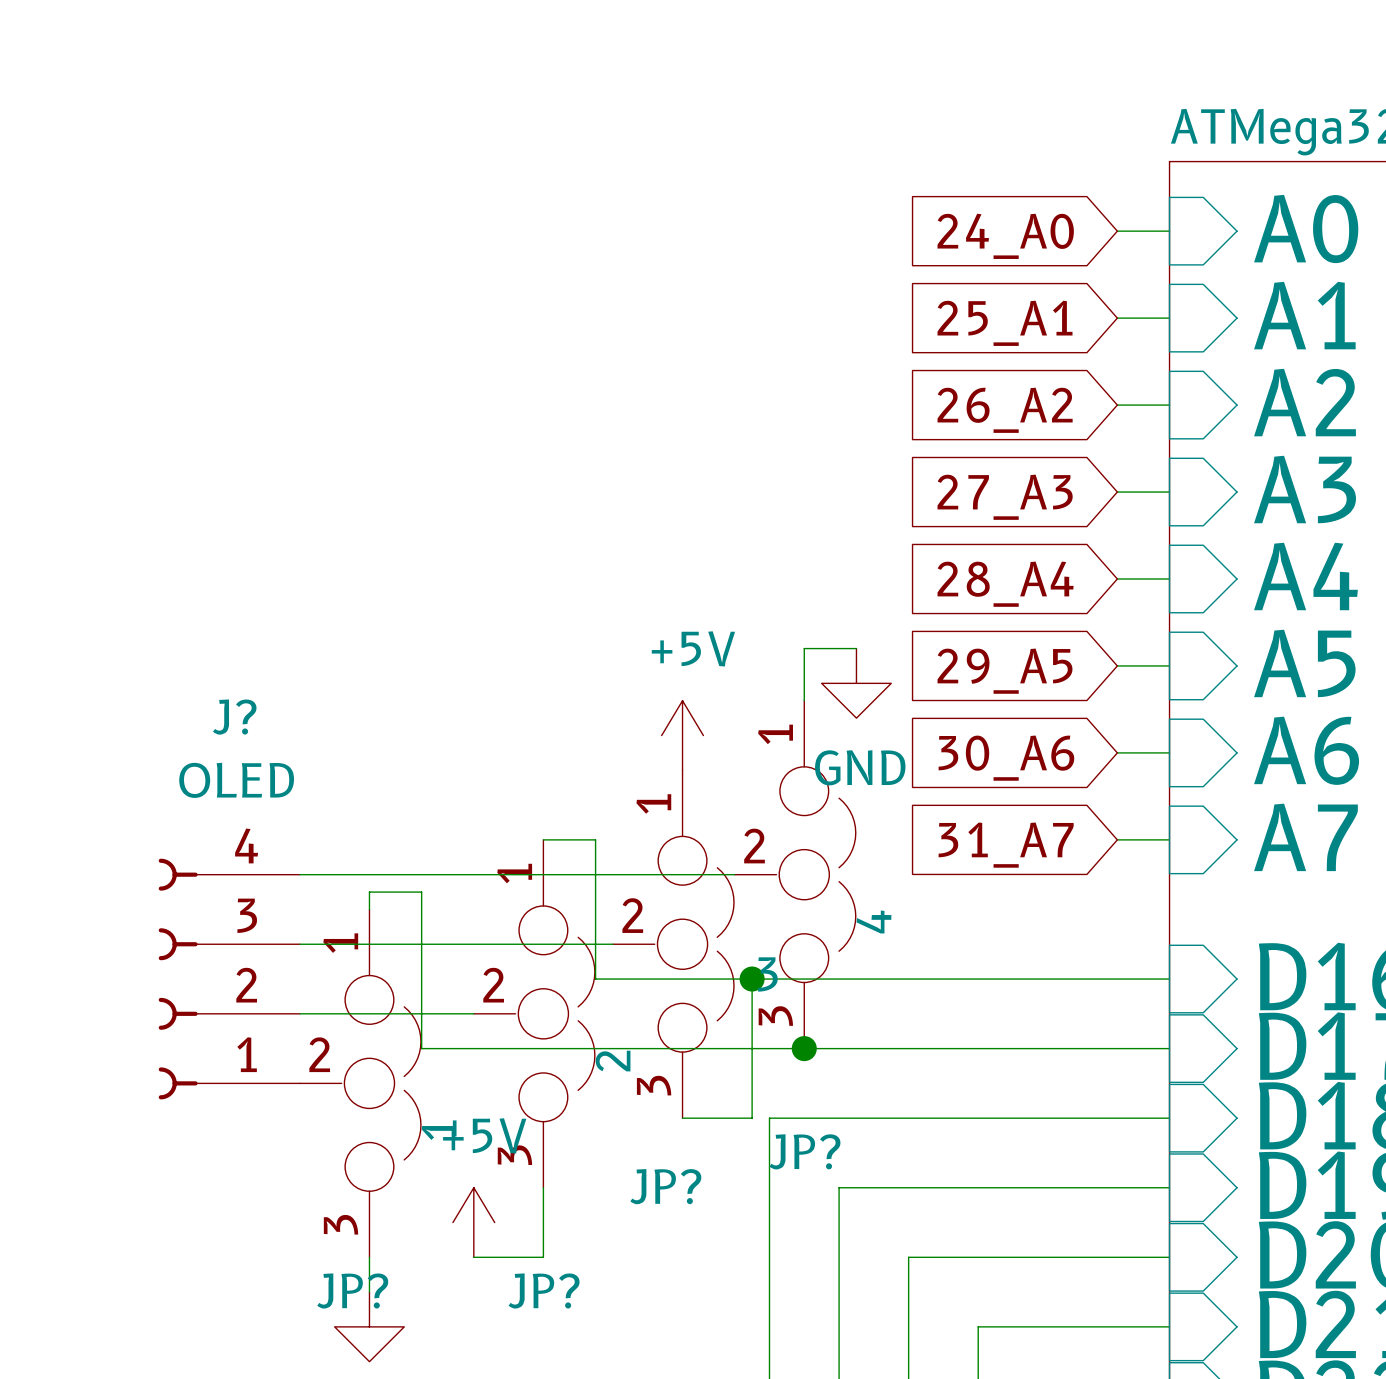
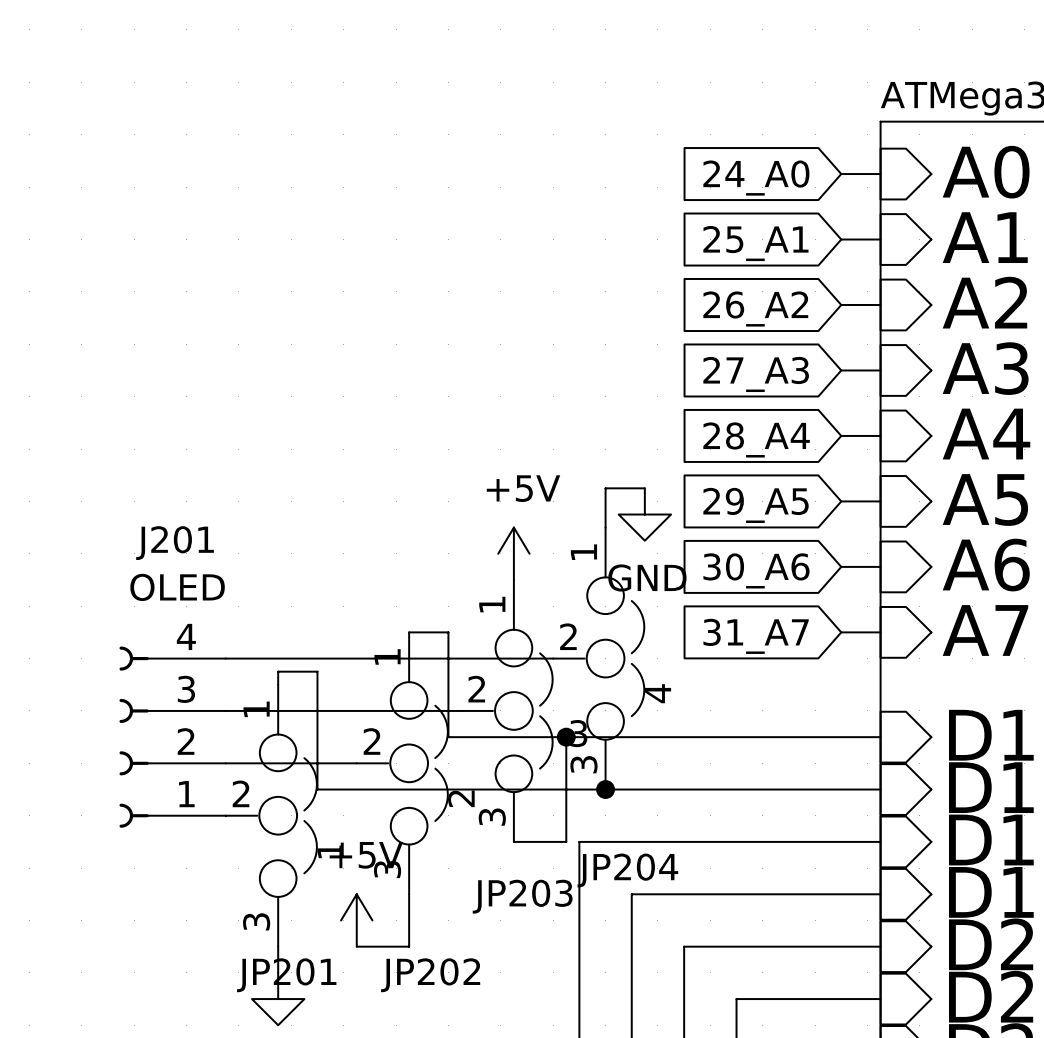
J? name: J? (234, 717) -> J201 (175, 543)
JP? name: JP? (804, 1151) -> JP204 (627, 870)
JP? name: JP? (665, 1186) -> JP203 (522, 896)
JP? name: JP? (352, 1290) -> JP201 (286, 975)
JP? name: JP? (544, 1290) -> JP202 (430, 975)

